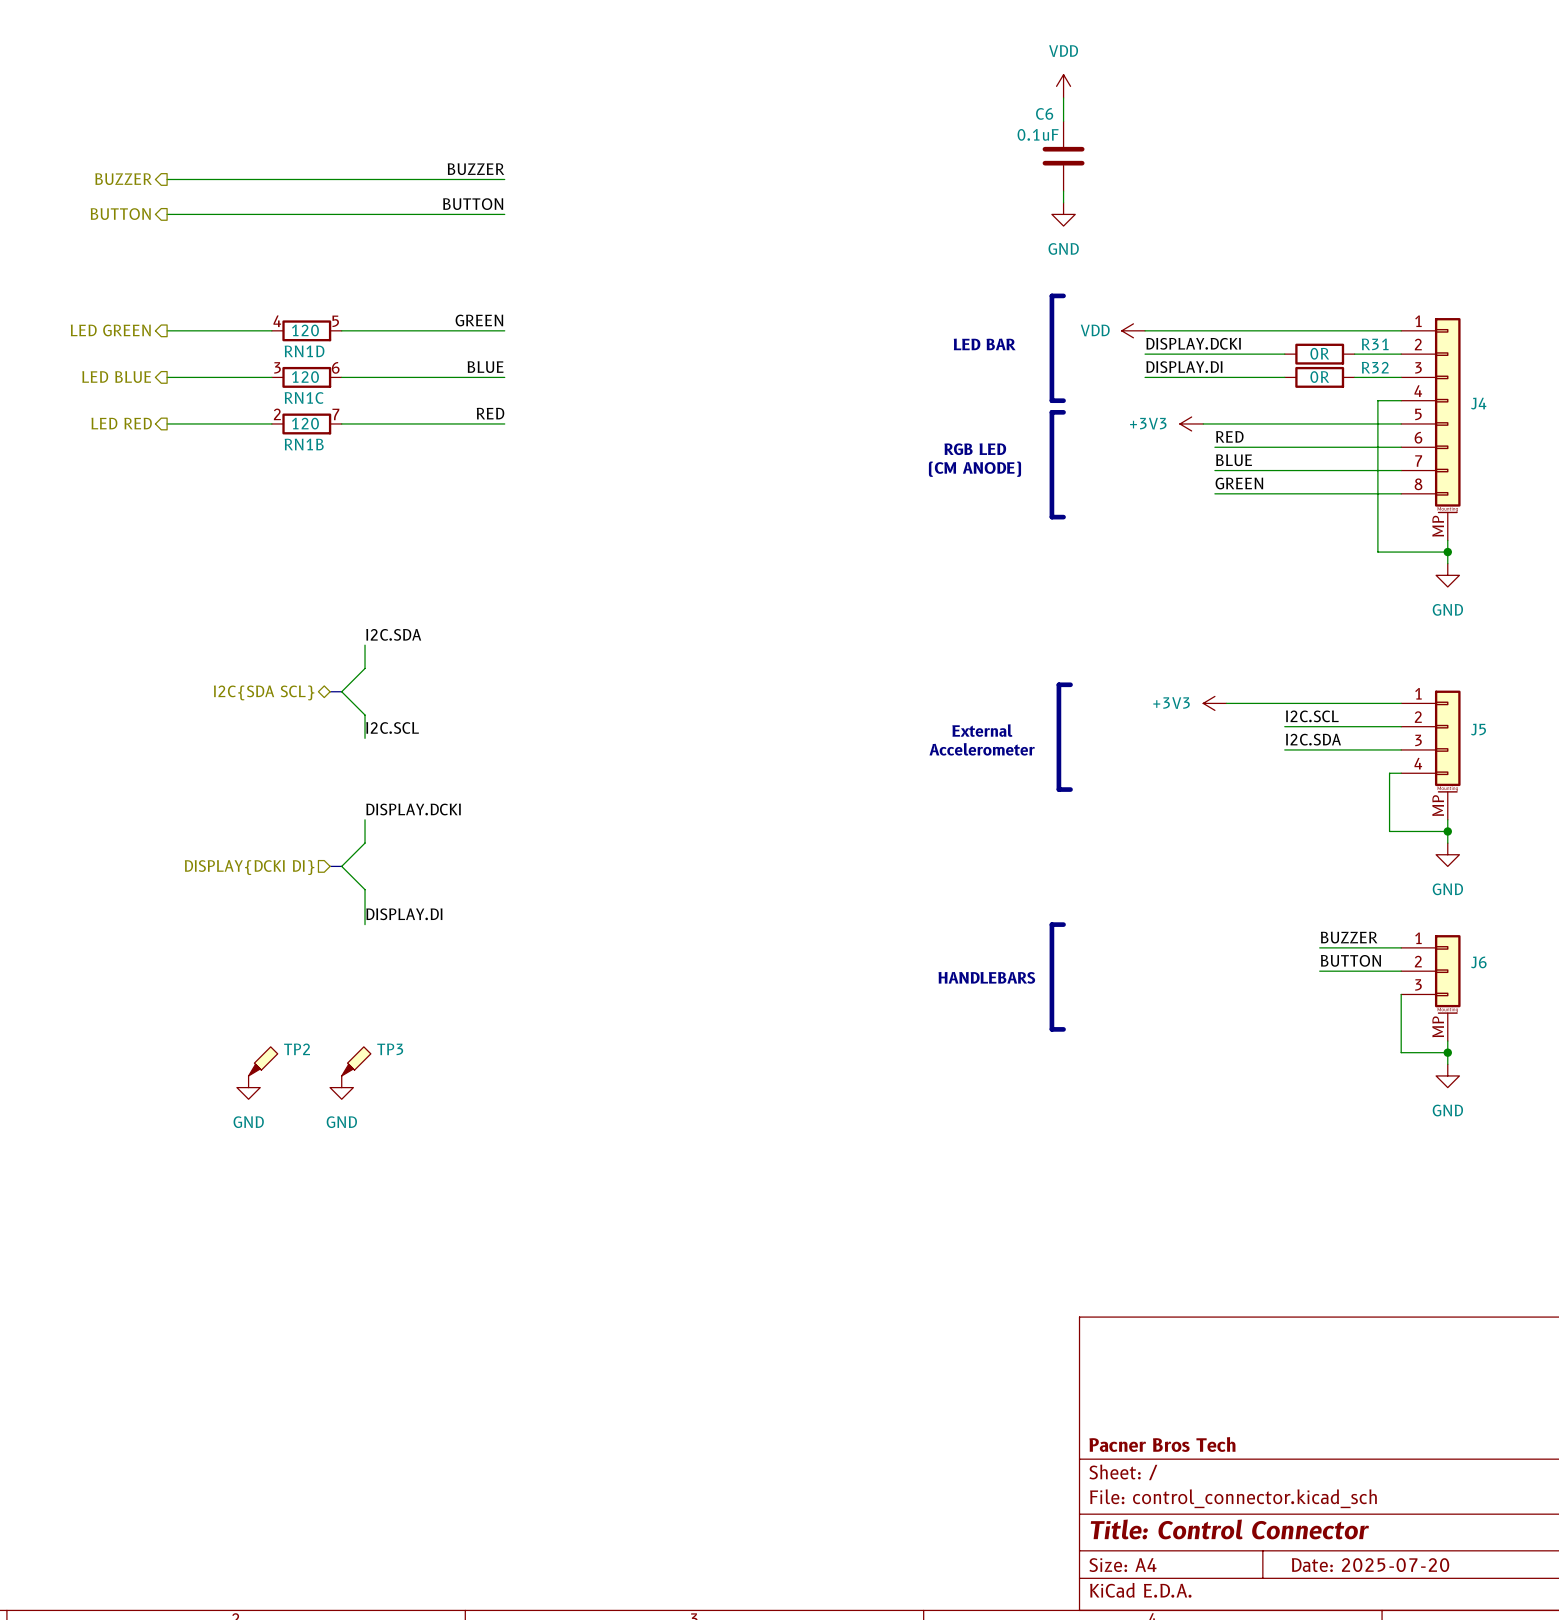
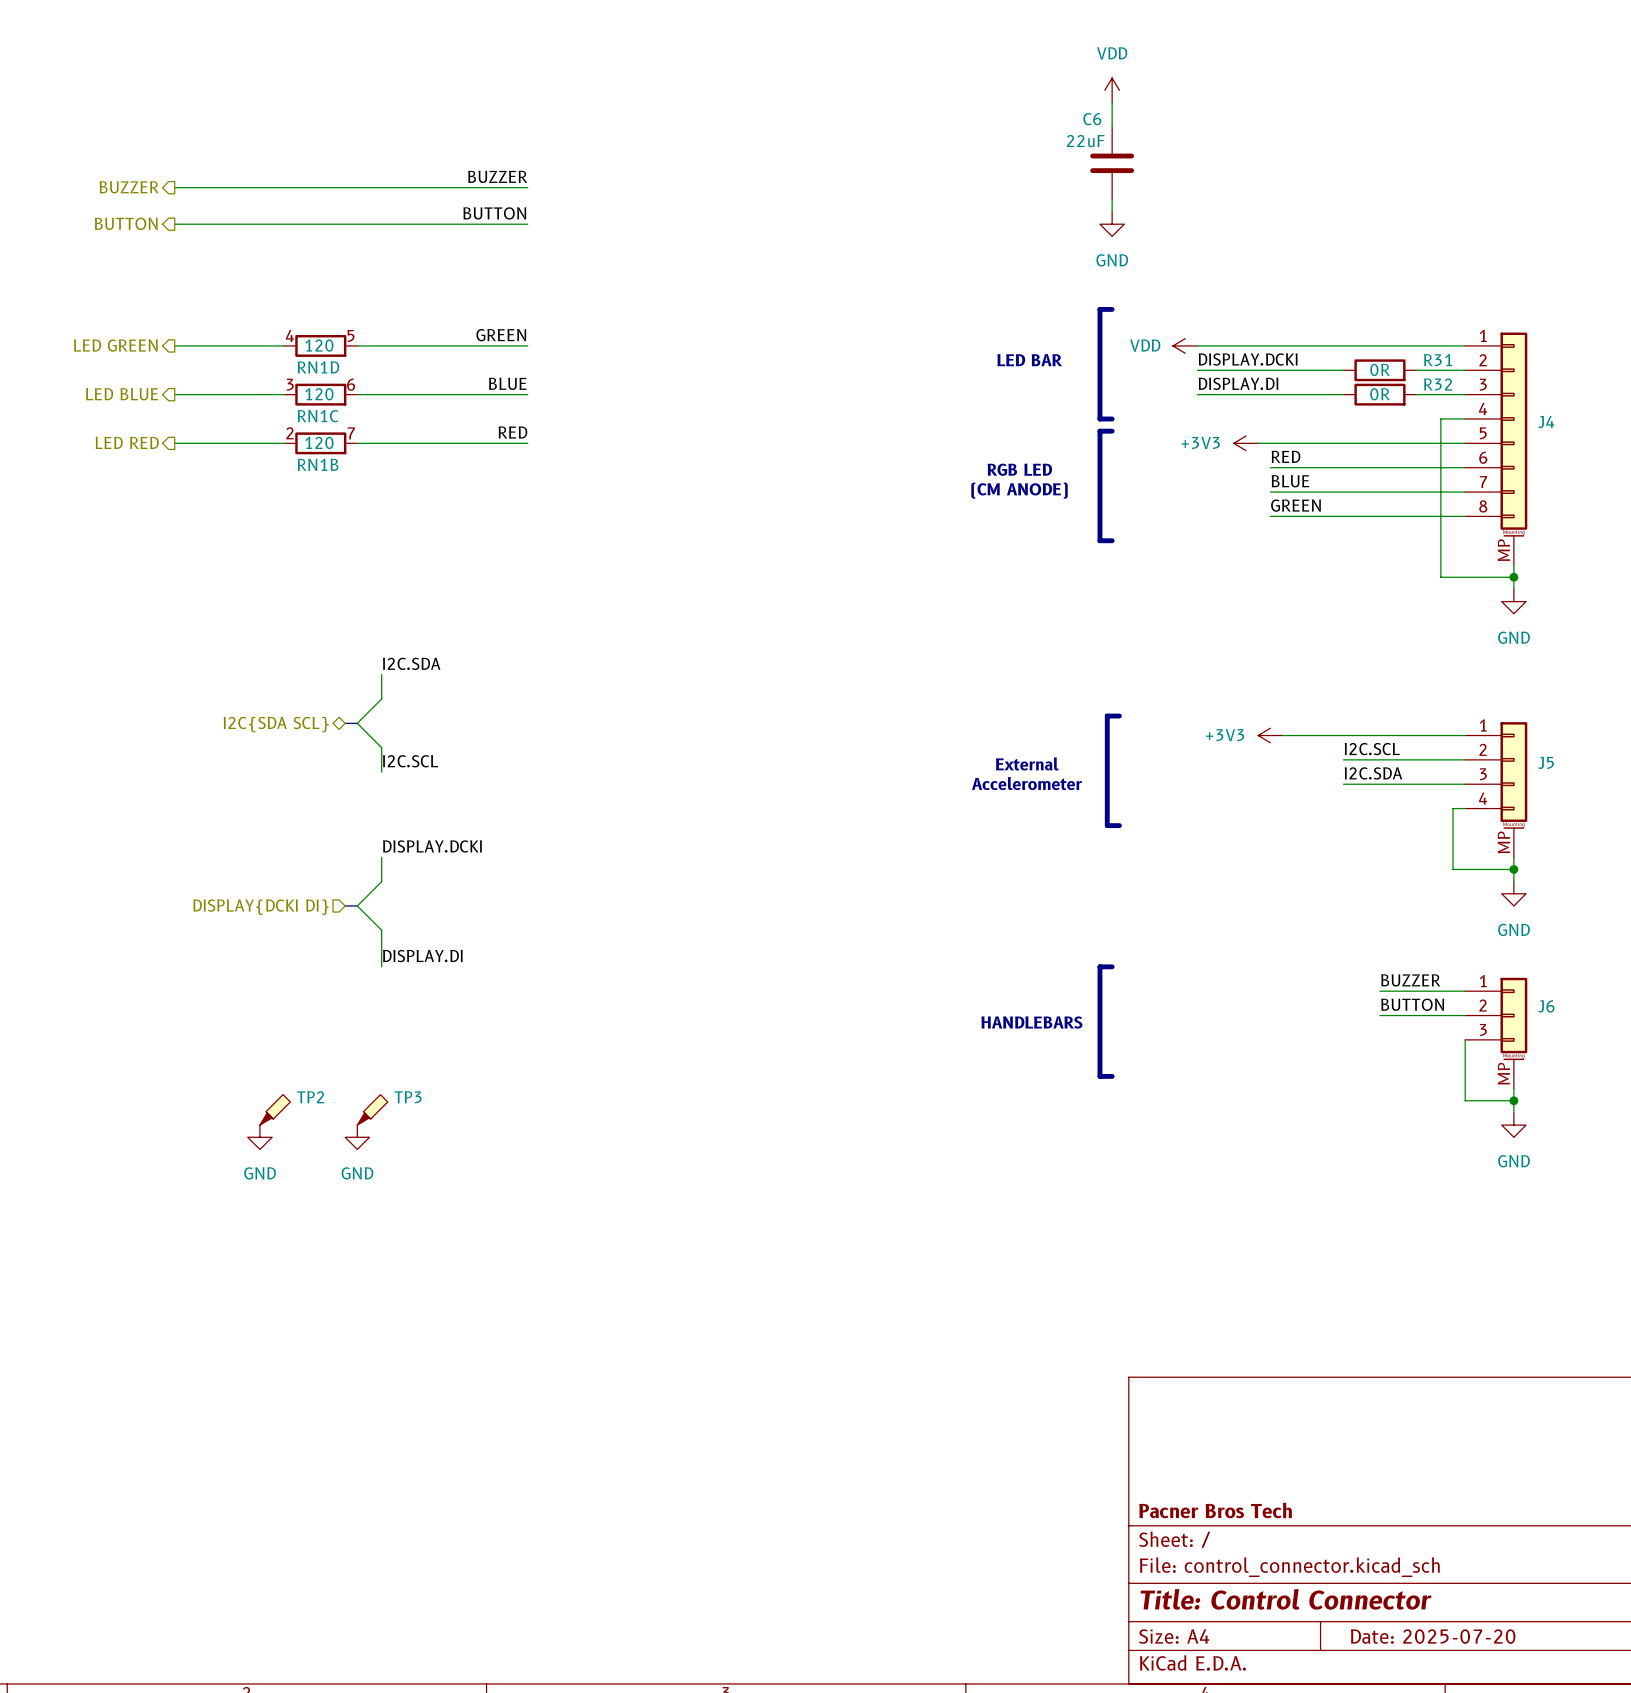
C6 value: 0.1uF (1038, 134) -> 22uF (1085, 141)

